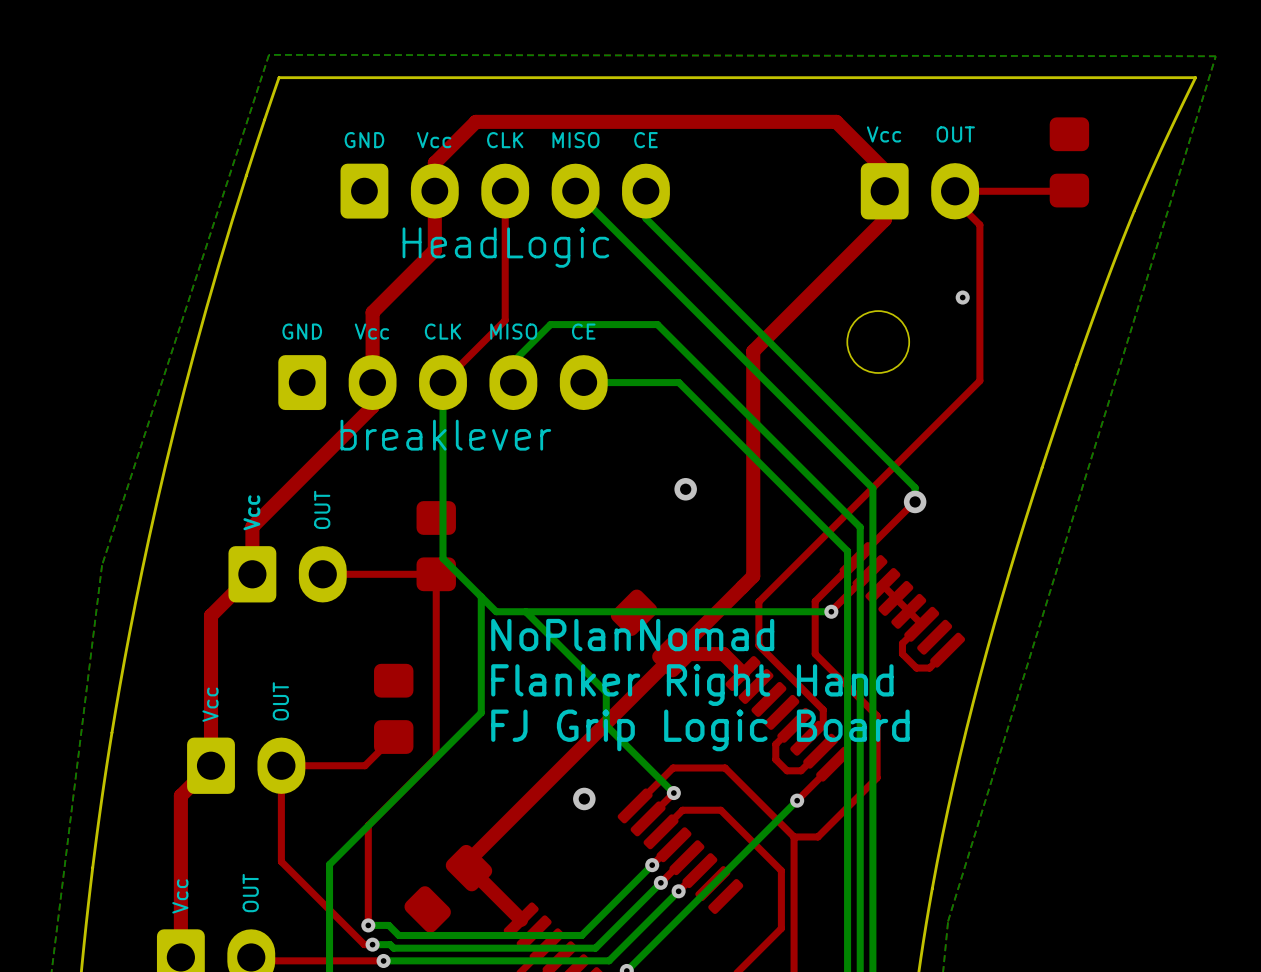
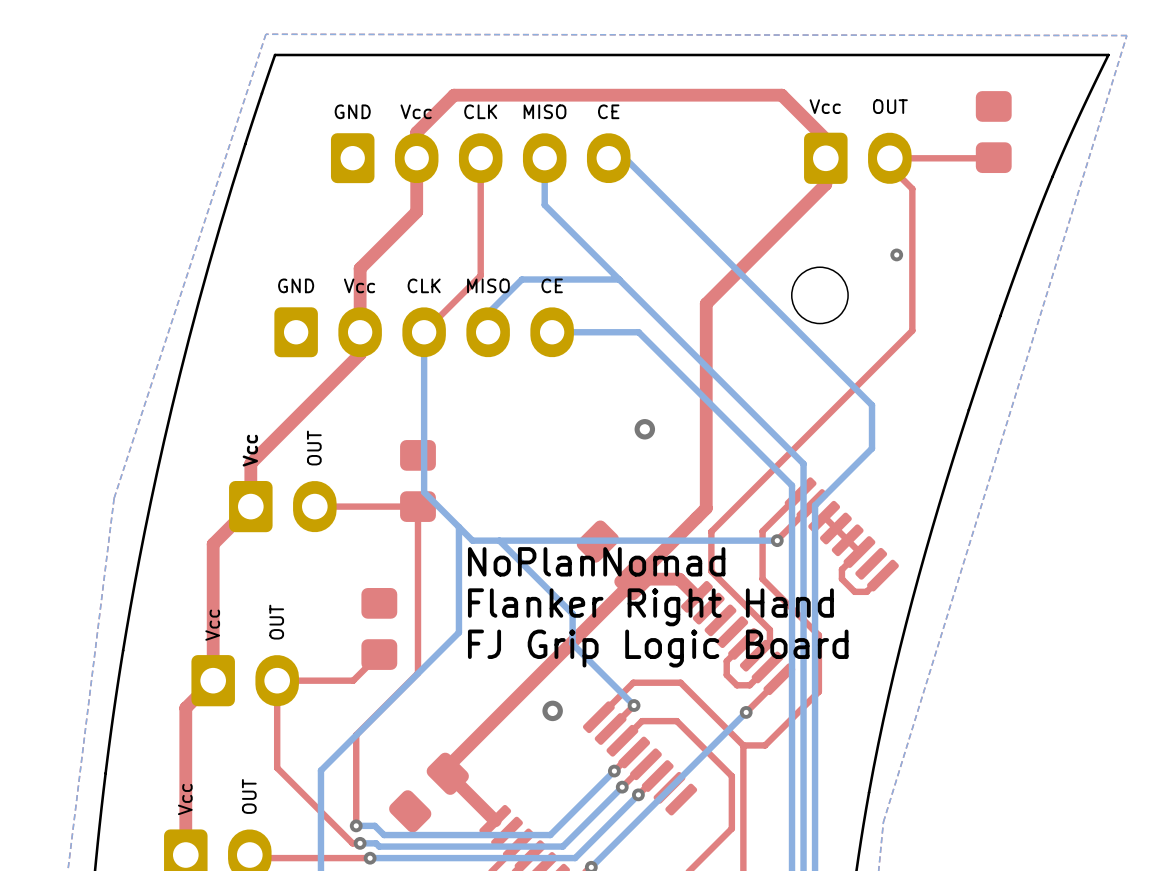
bottom track: (575, 191) (872, 488) (872, 573) -> (616, 150) (872, 405) (872, 448) (815, 505)
bottom track: none -> (544, 158) (544, 205) (619, 279)
bottom track: (645, 191) (645, 218) (915, 487) (915, 501) -> none
part text: HeadLogic (505, 247) -> none
part text: breaklever (445, 435) -> none
top track: (914, 501) (857, 559) -> none
via: (915, 501) -> none

